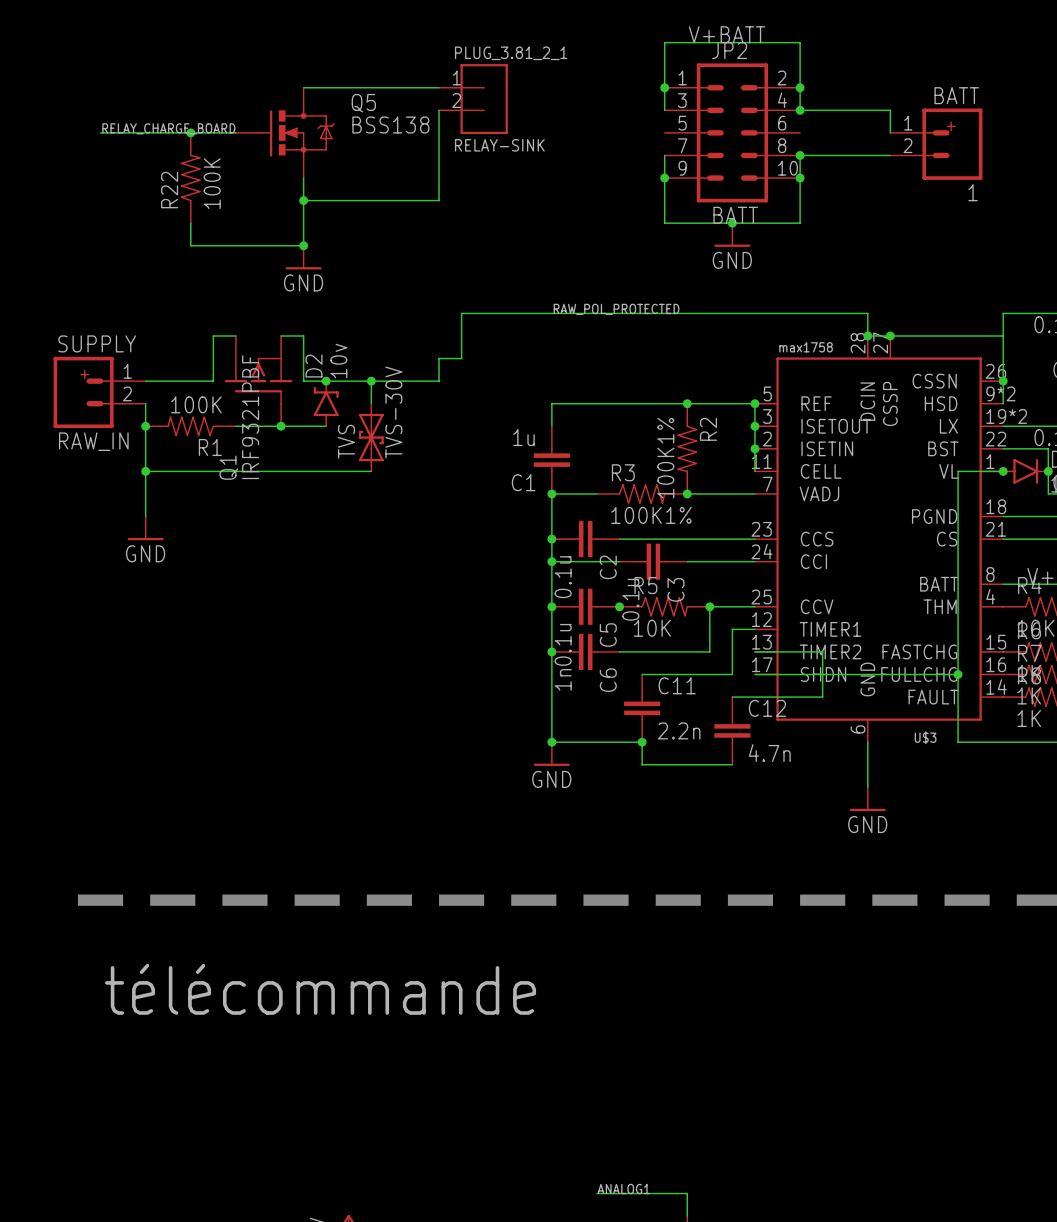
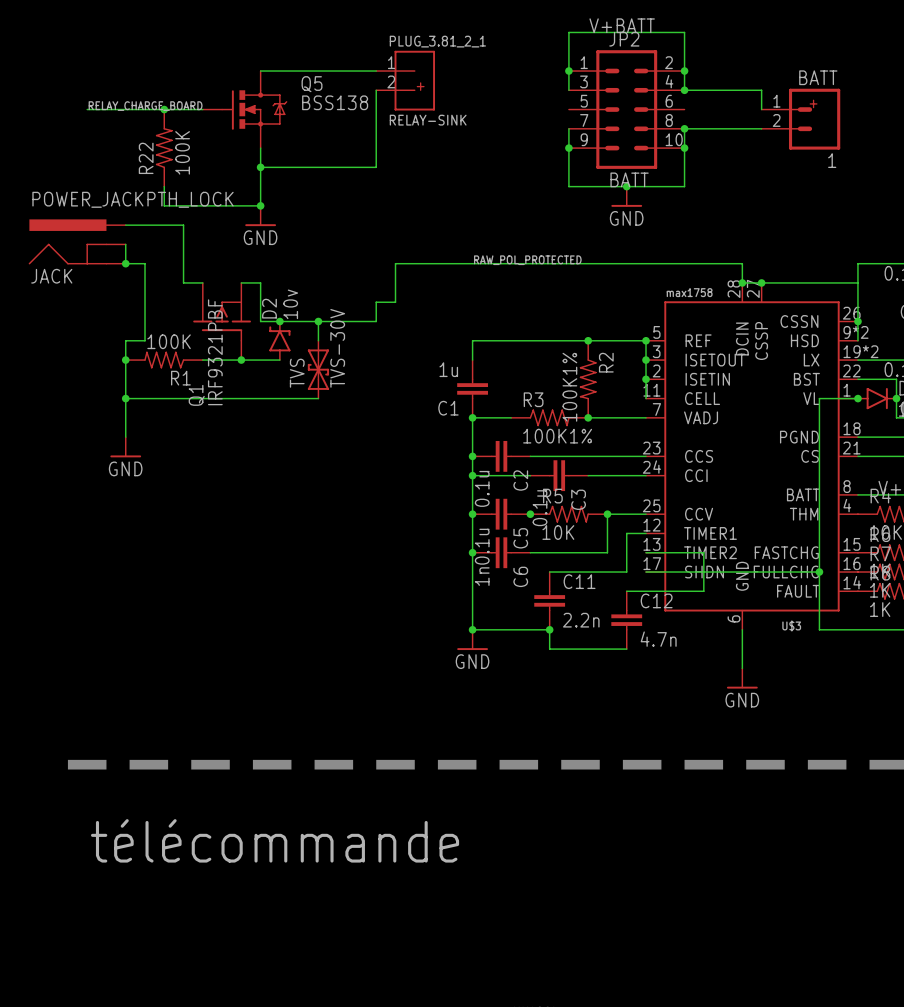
PLUG_3.81_2_1 text: none -> + (420, 86)
JACK: none -> POWER_JACKPTH_LOCK (77, 241)
wire: none -> (125, 244) (125, 263) (145, 263) (145, 340) (125, 340)
junction: none -> (125, 263)
wire: (213, 336) (213, 381) (145, 381) -> (183, 282) (183, 225) (125, 225)
RAW_IN: SUPPLY (99, 392) -> none

